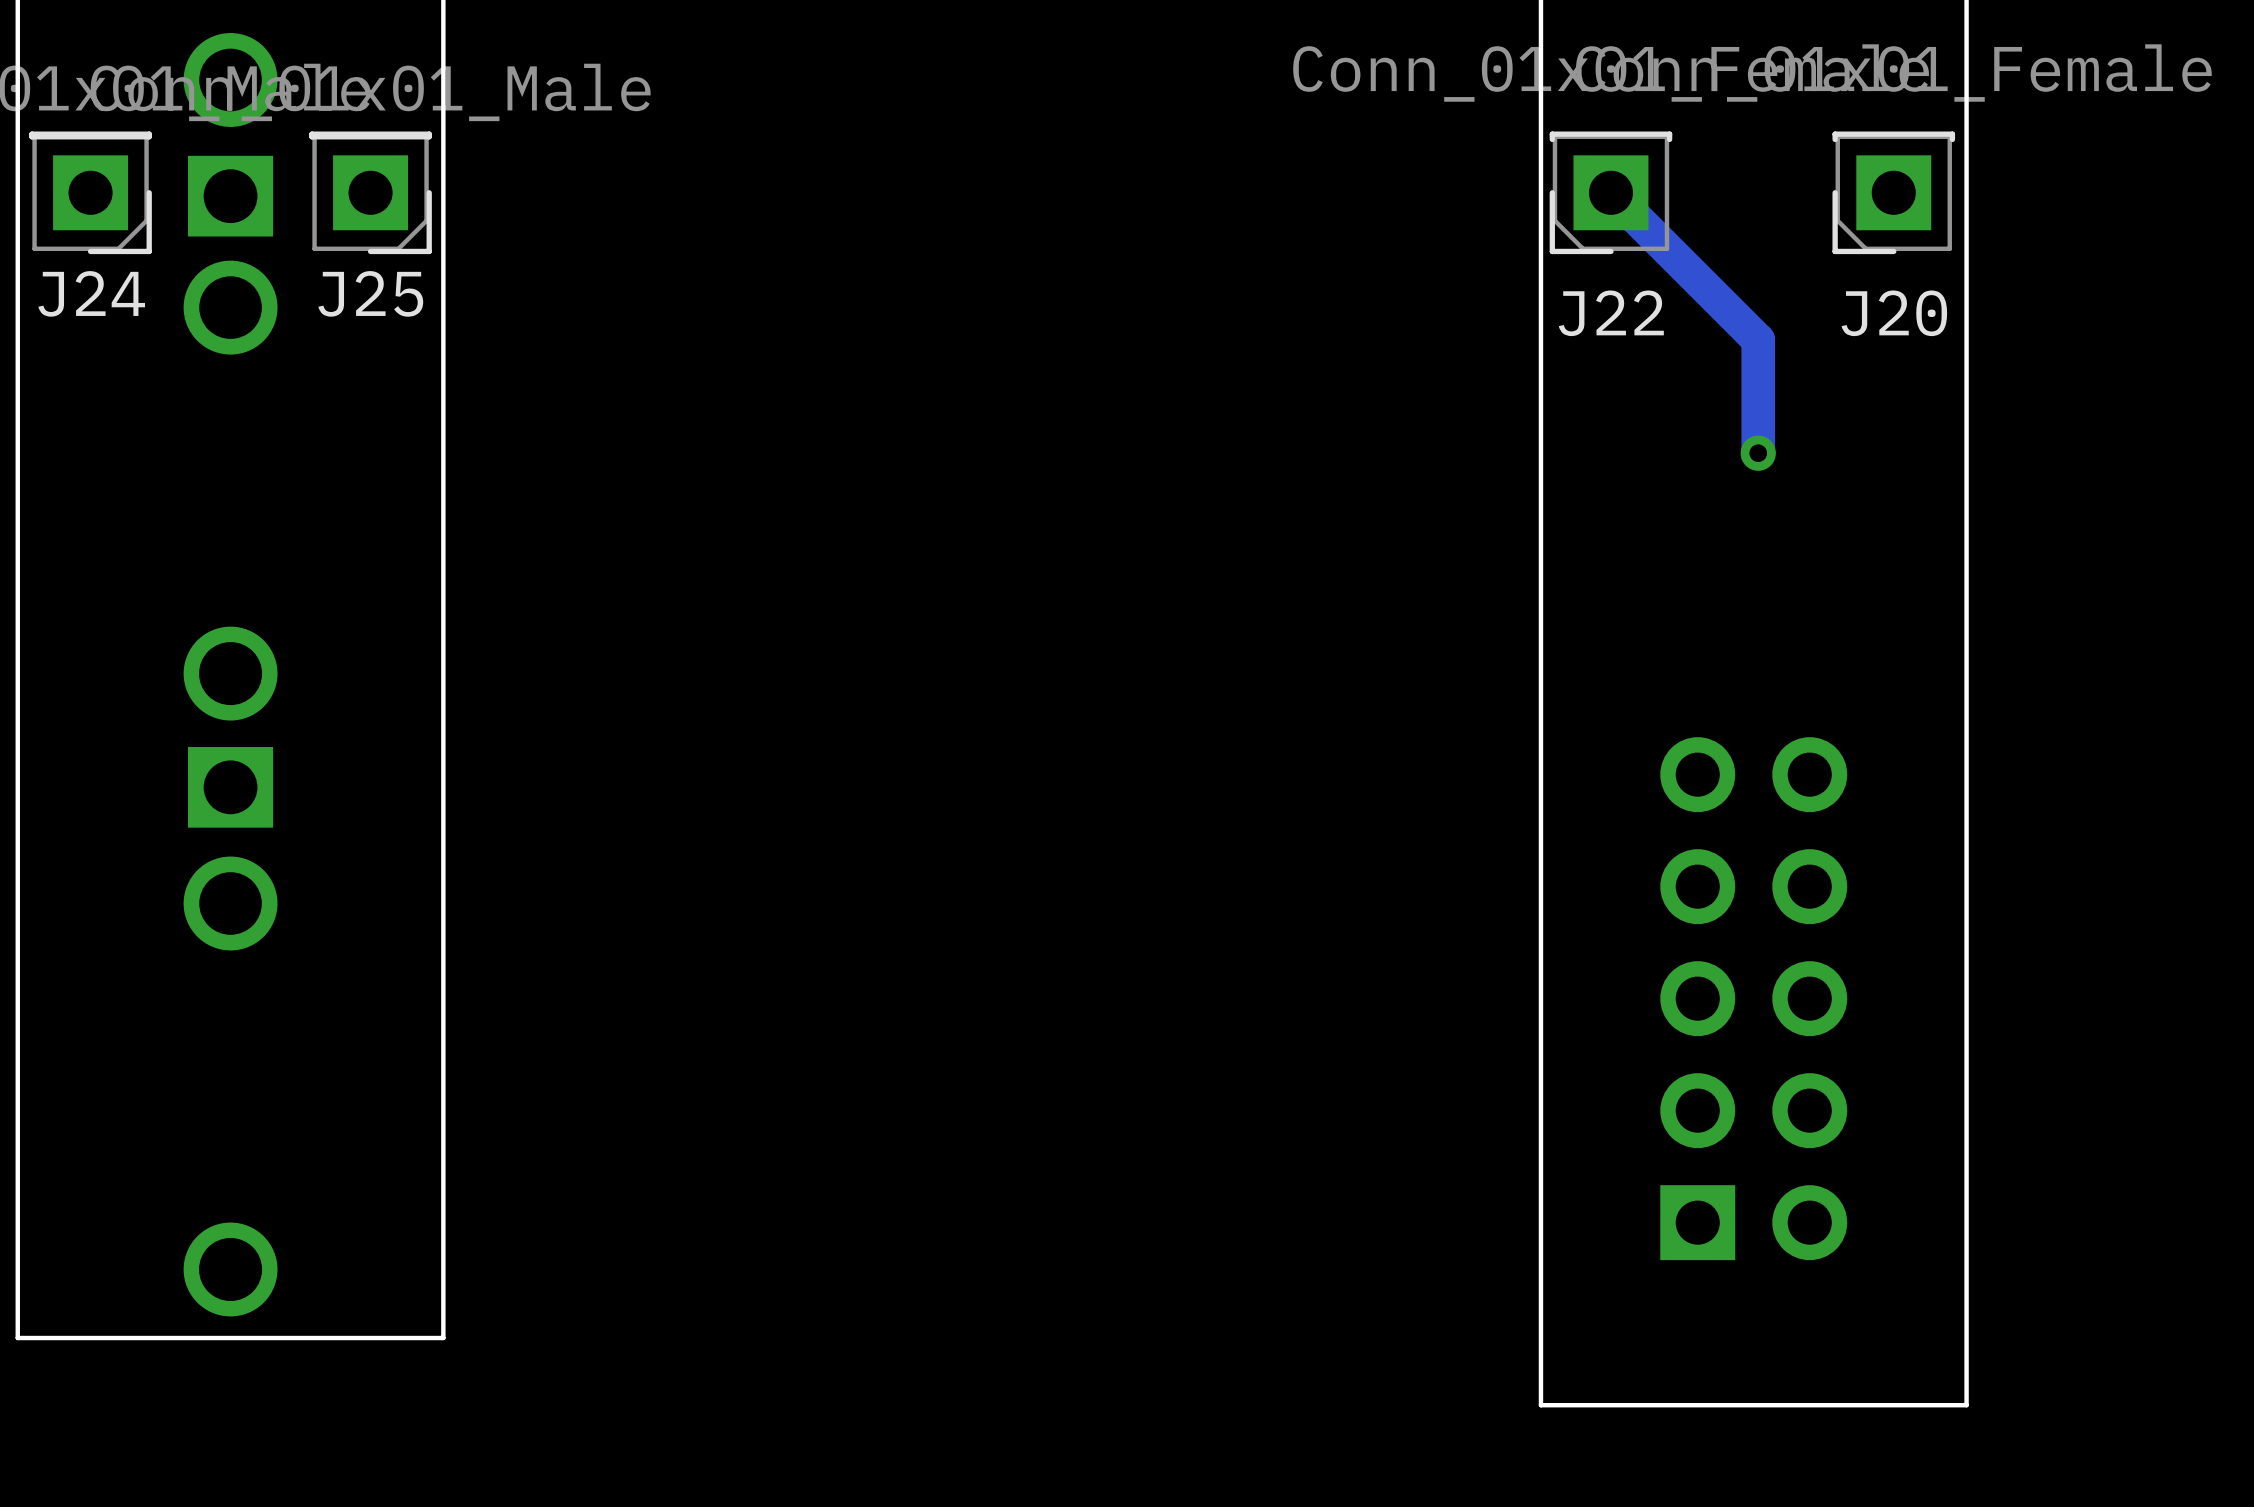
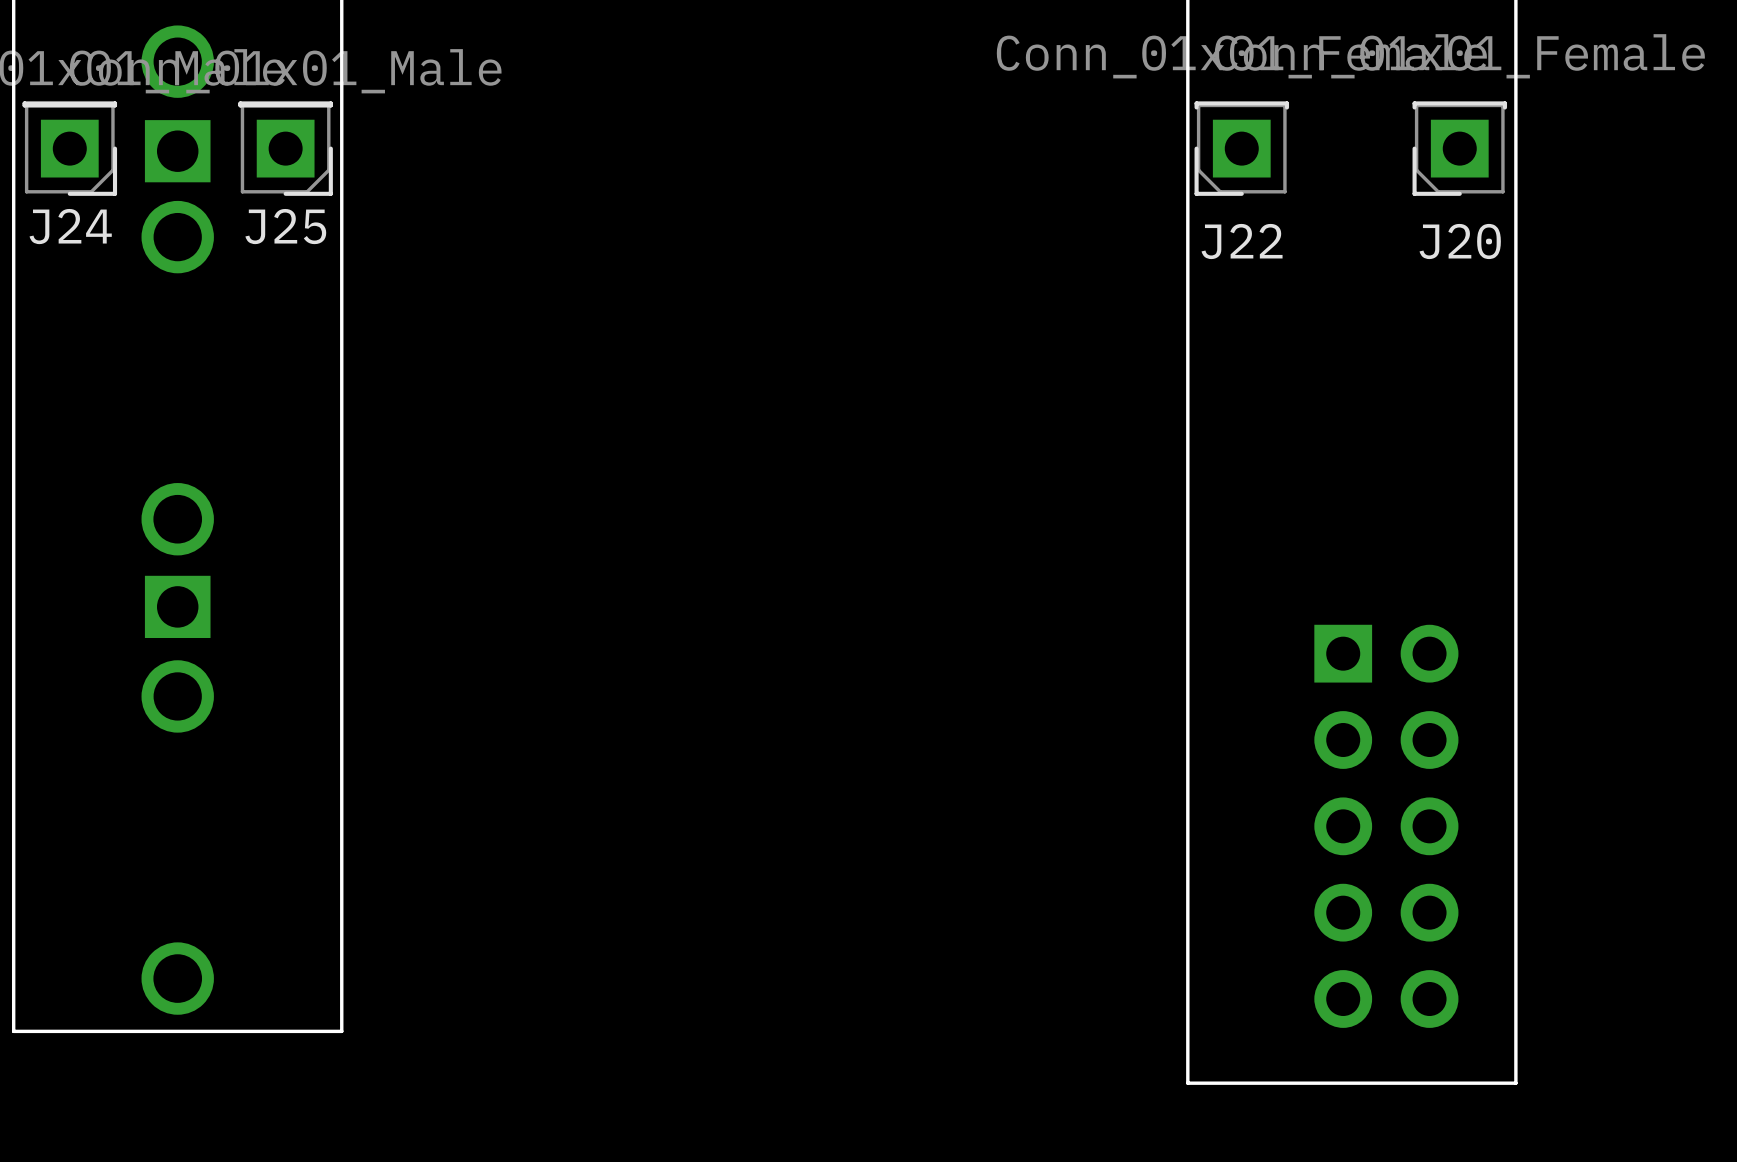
track: (1610, 192) (1758, 340) (1758, 453) -> none
via: (1758, 453) -> none
part: (1753, 998) -> none
part: none -> (1386, 826)

